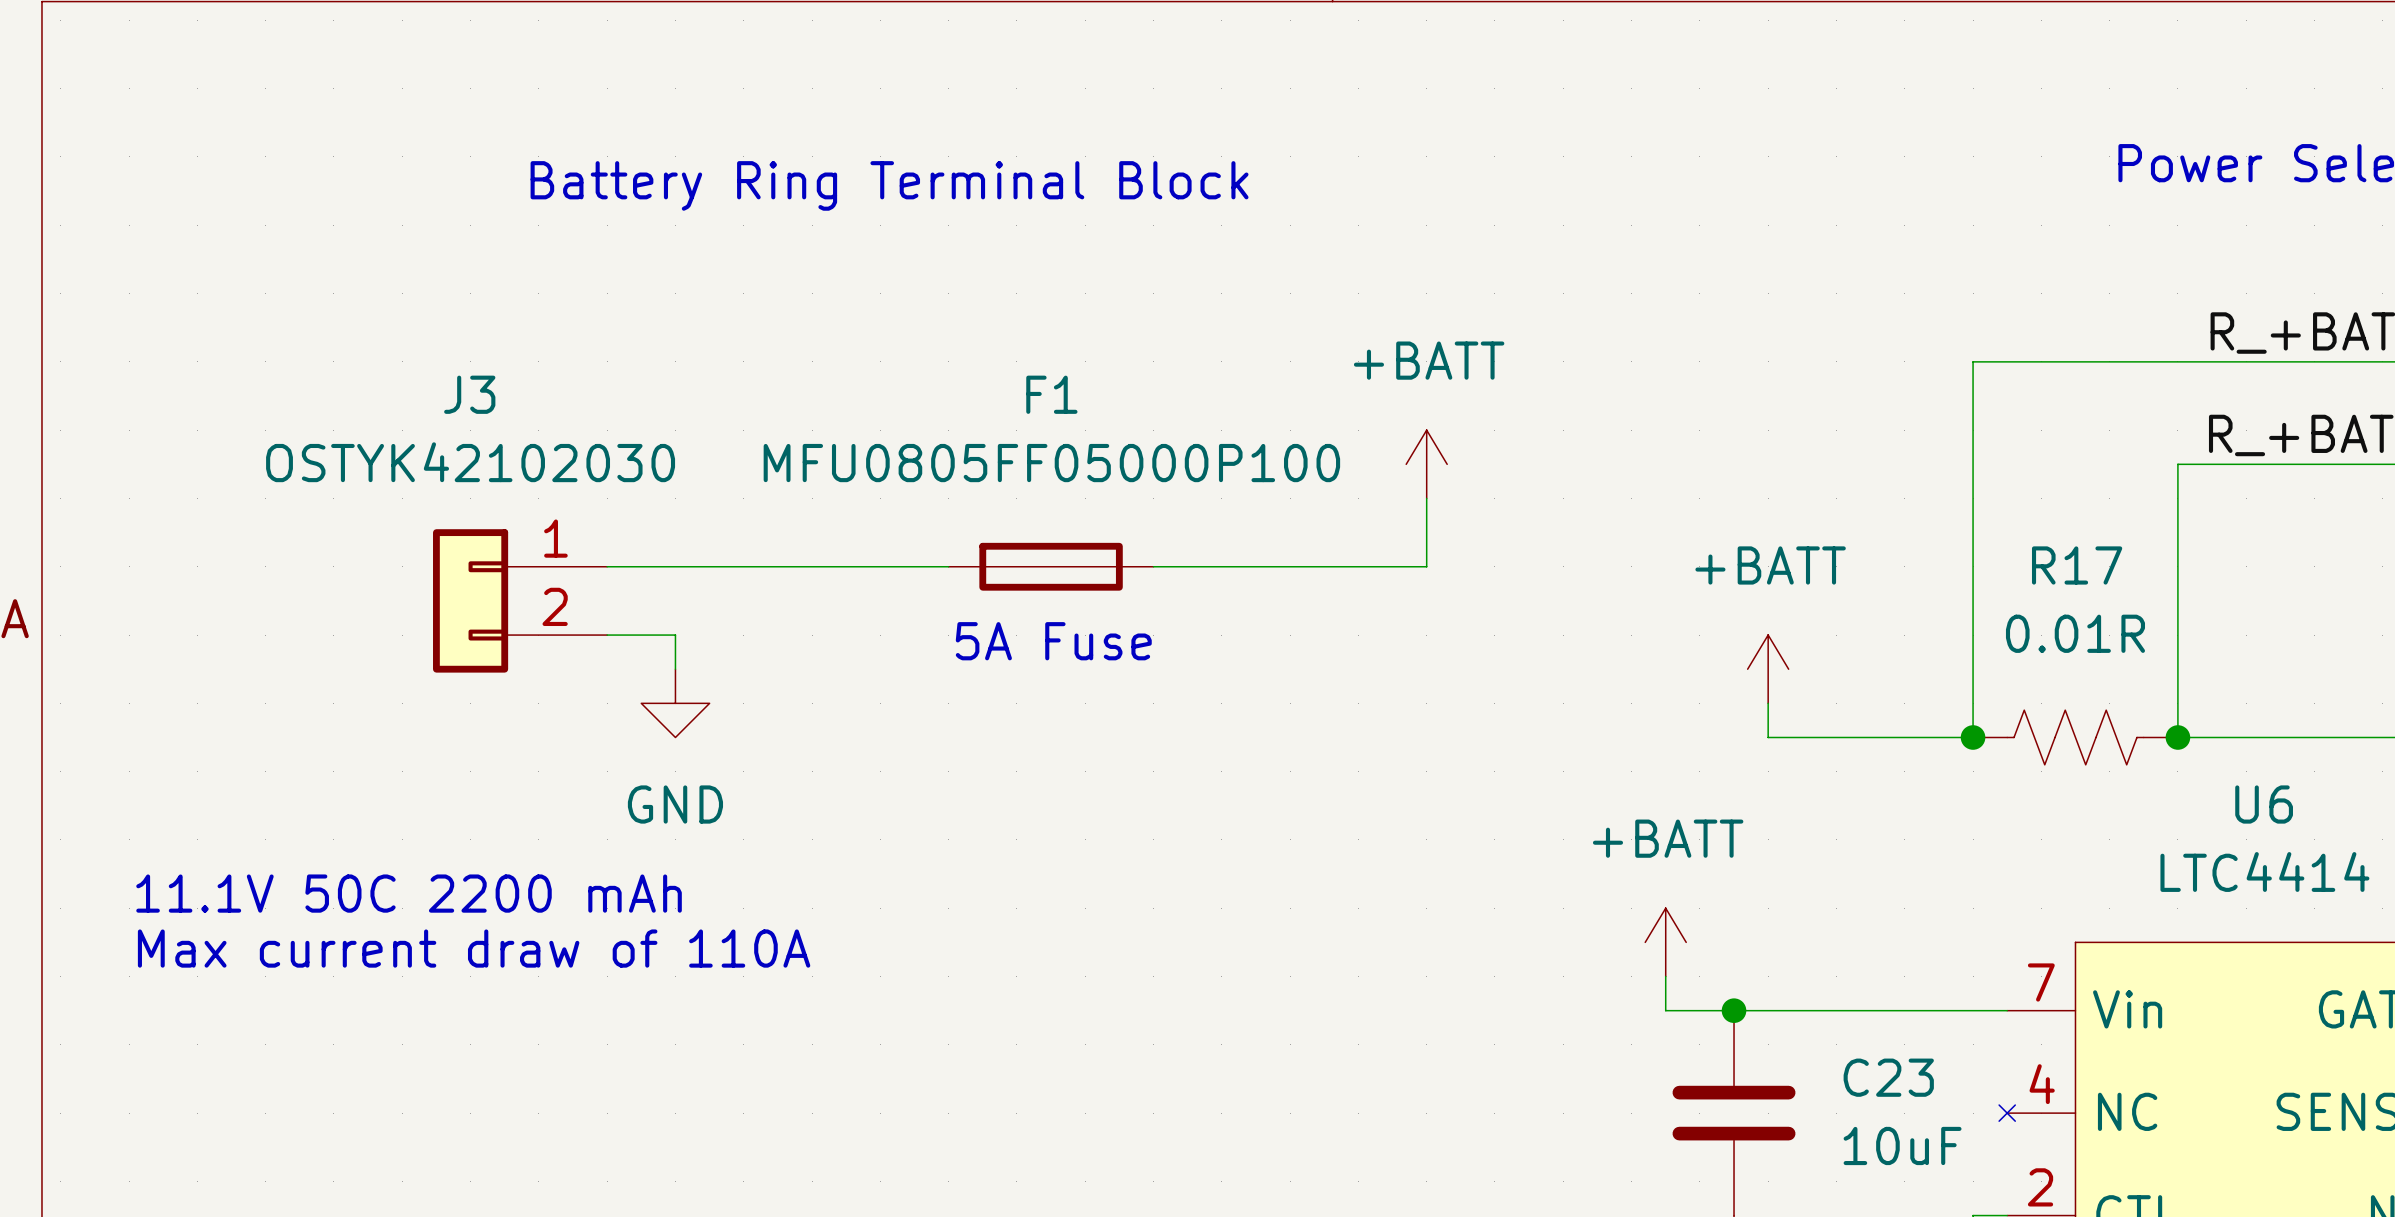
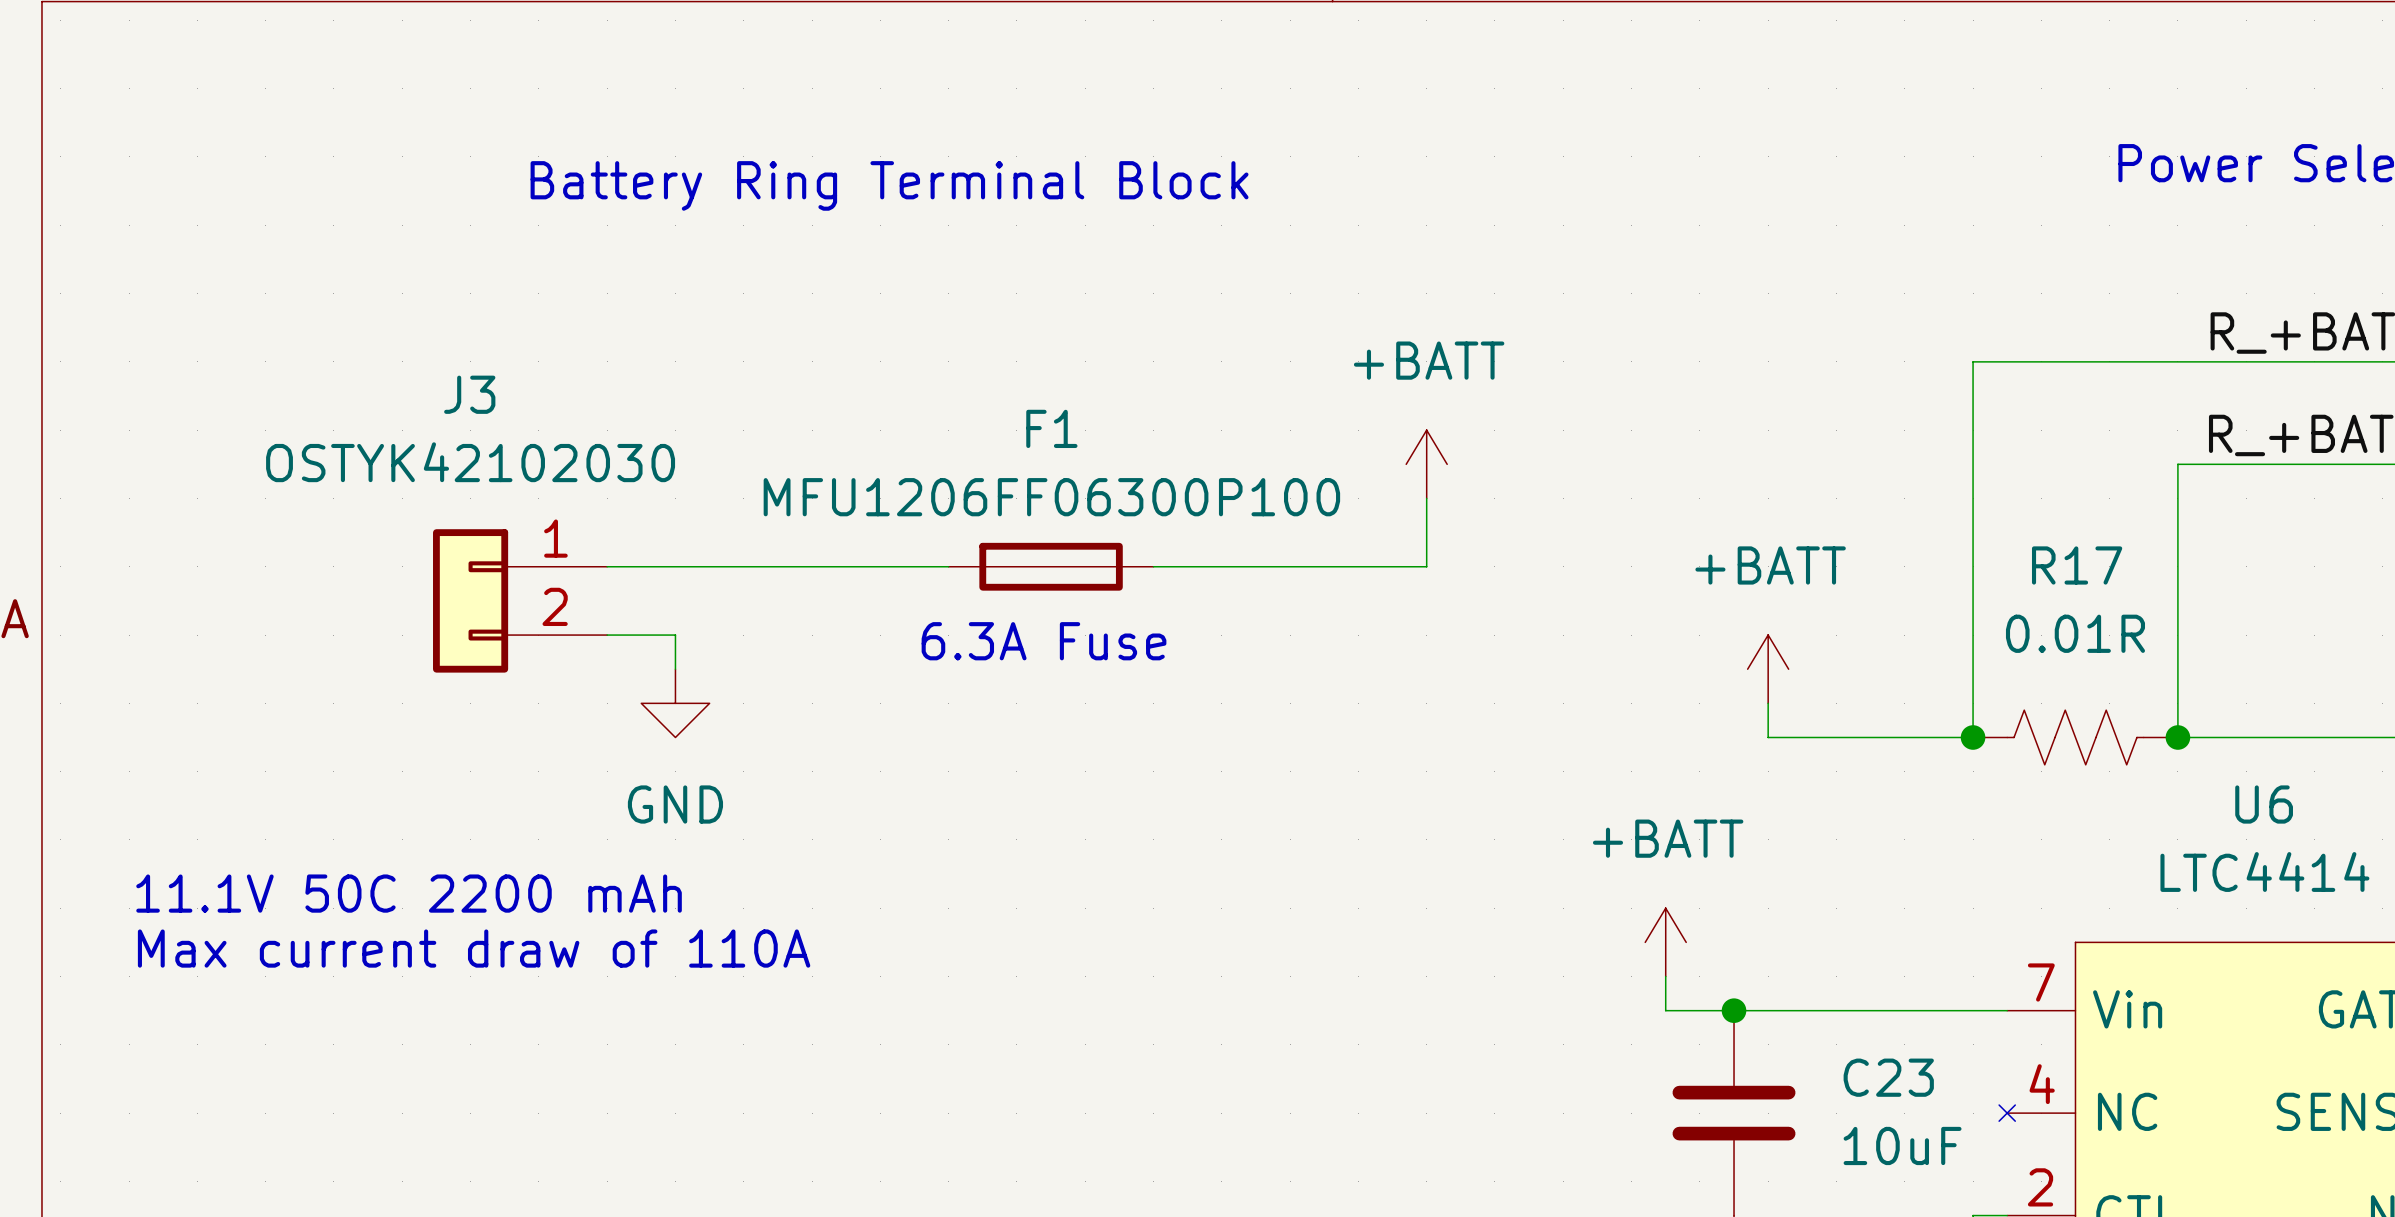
F1 name position: F1 (1051, 394) -> F1 (1051, 428)
F1 value: MFU0805FF05000P100 (1051, 463) -> MFU1206FF06300P100 (1051, 497)
text: 5A Fuse (1053, 641) -> 6.3A Fuse (1044, 641)

